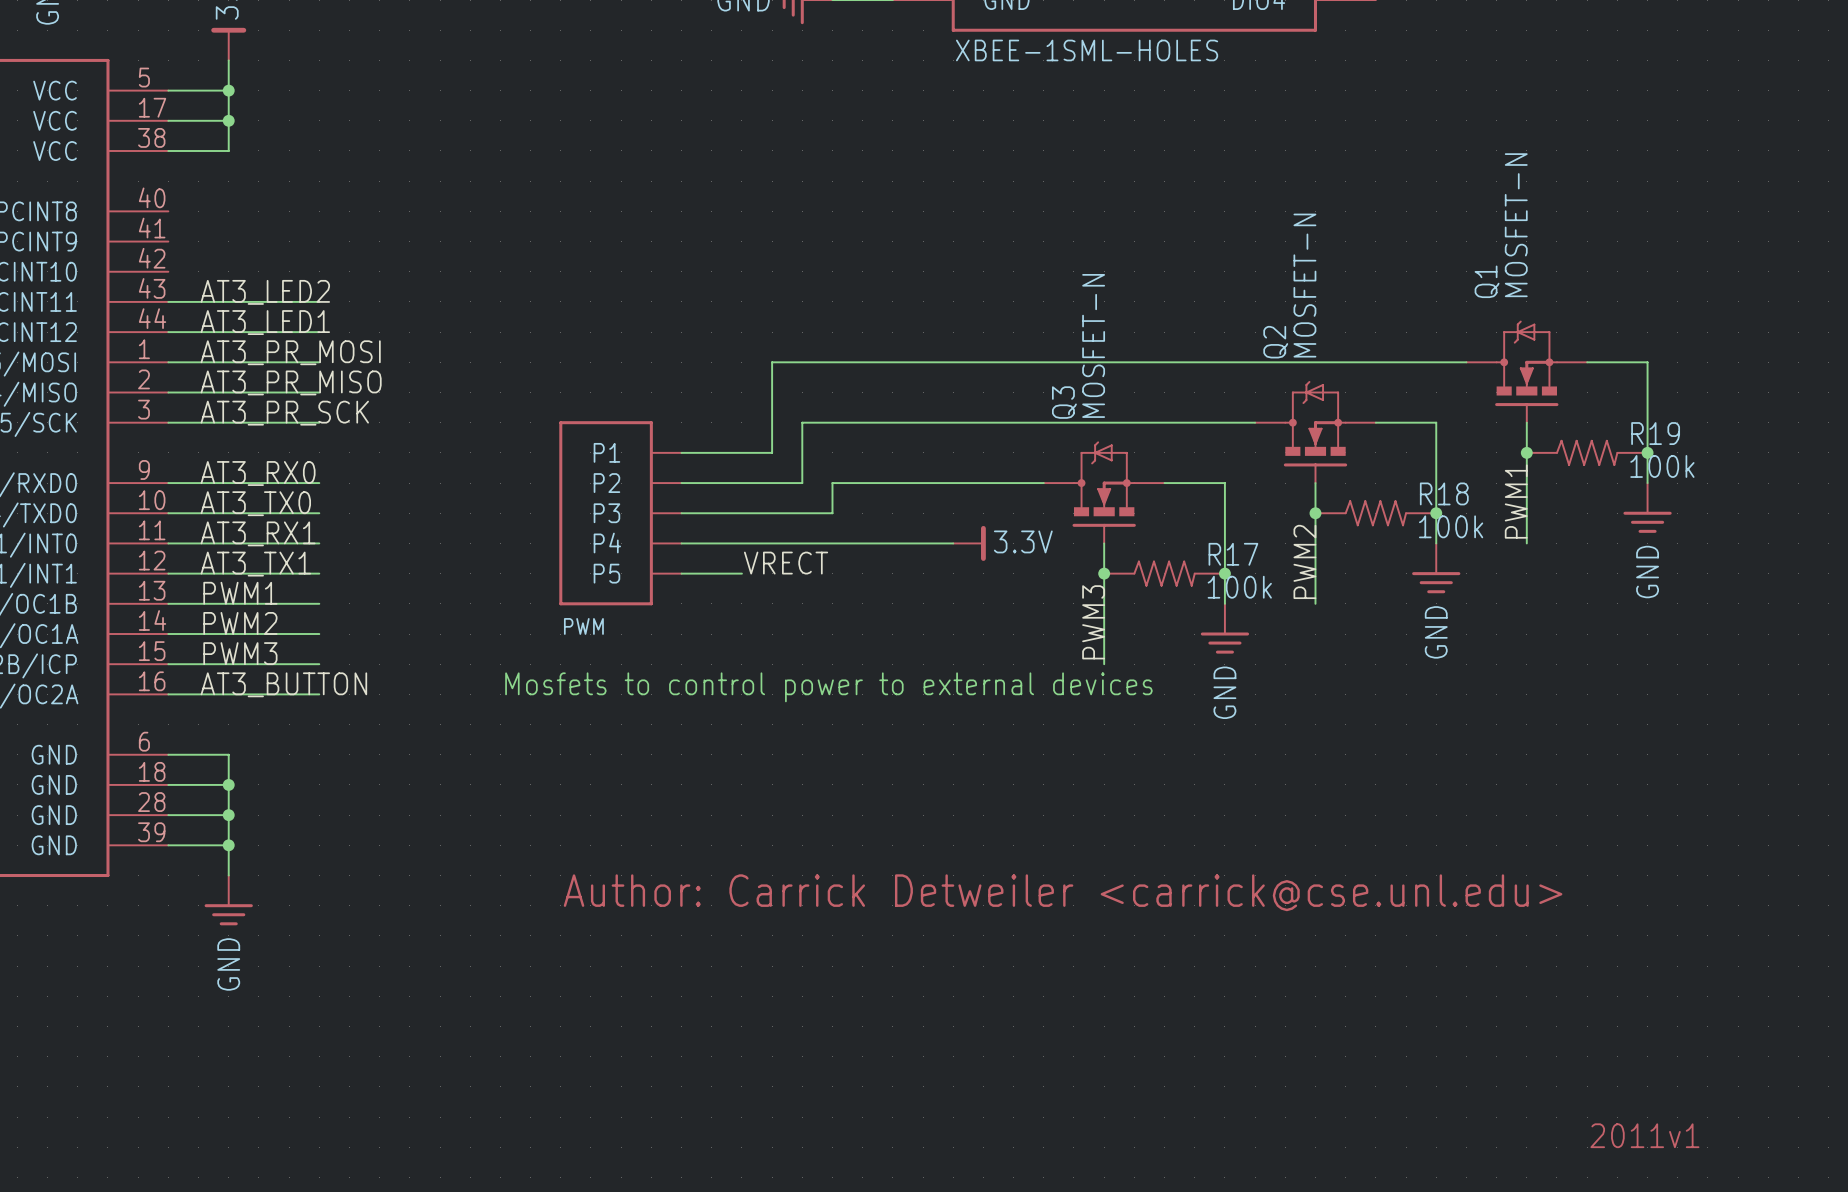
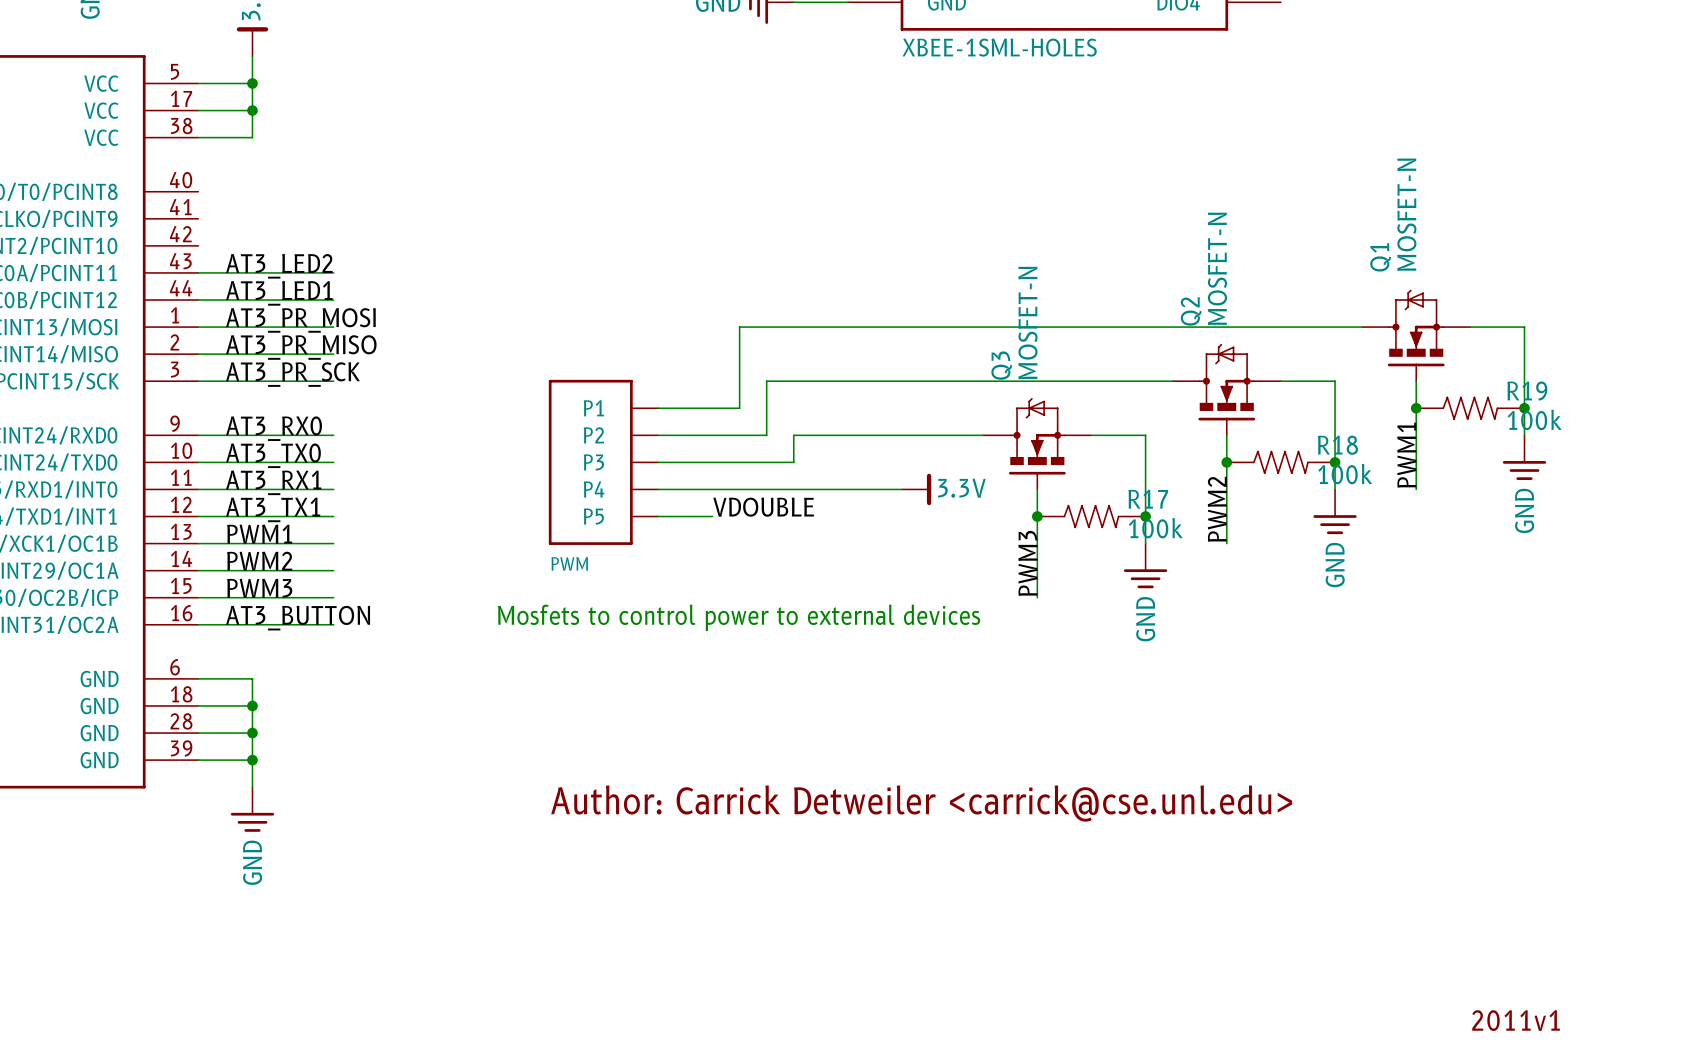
label: VRECT (786, 563) -> VDOUBLE (763, 507)

